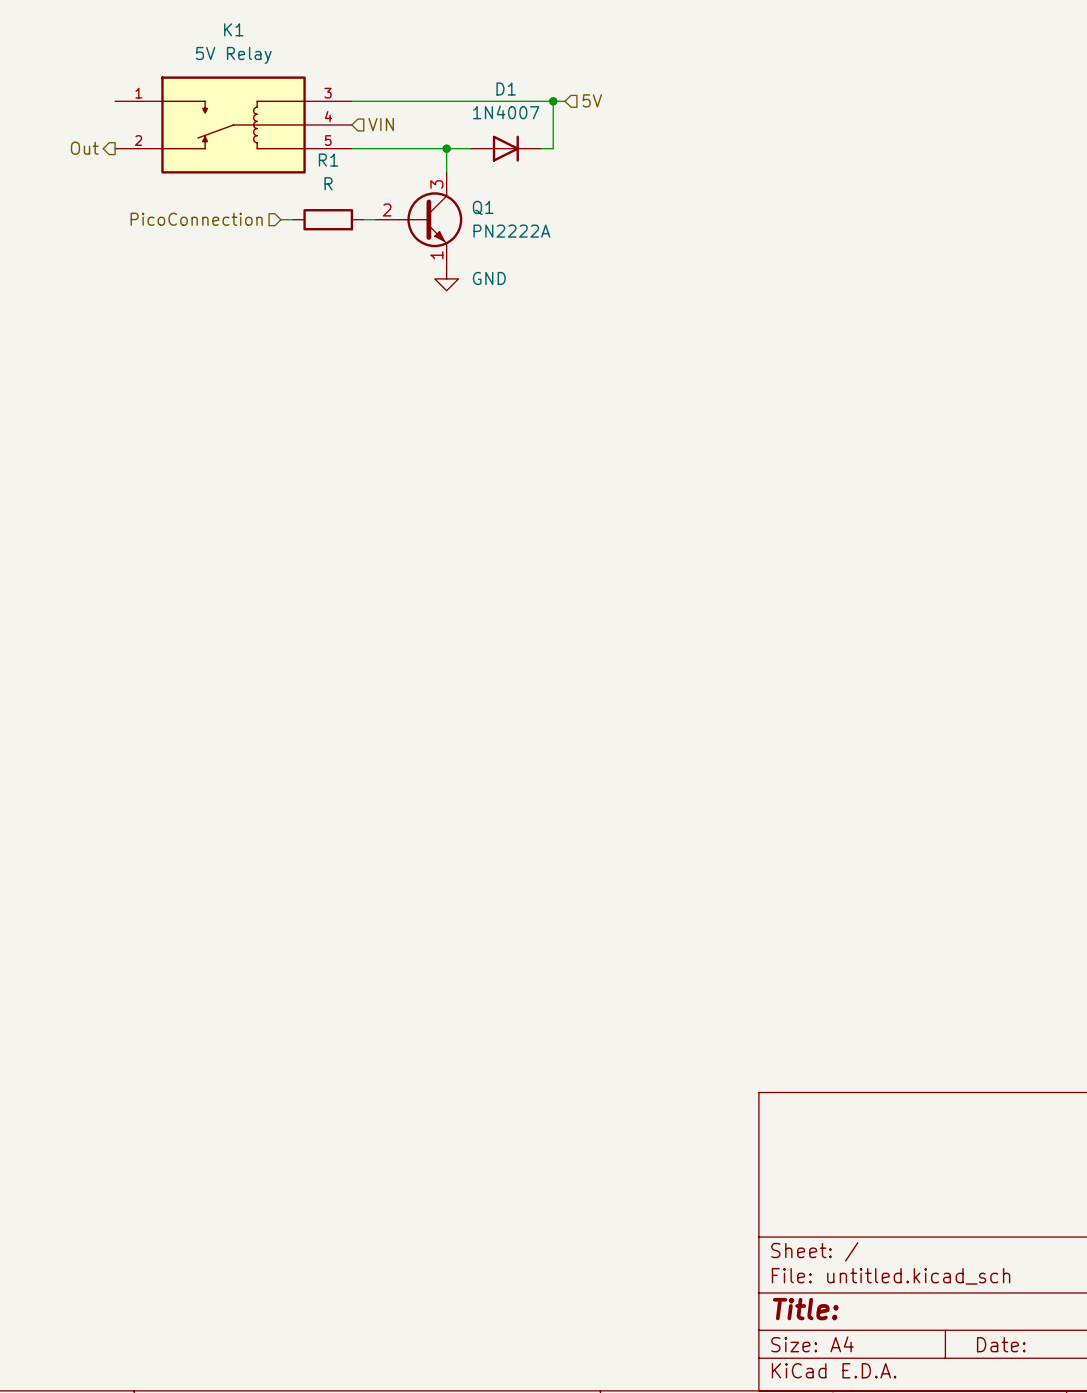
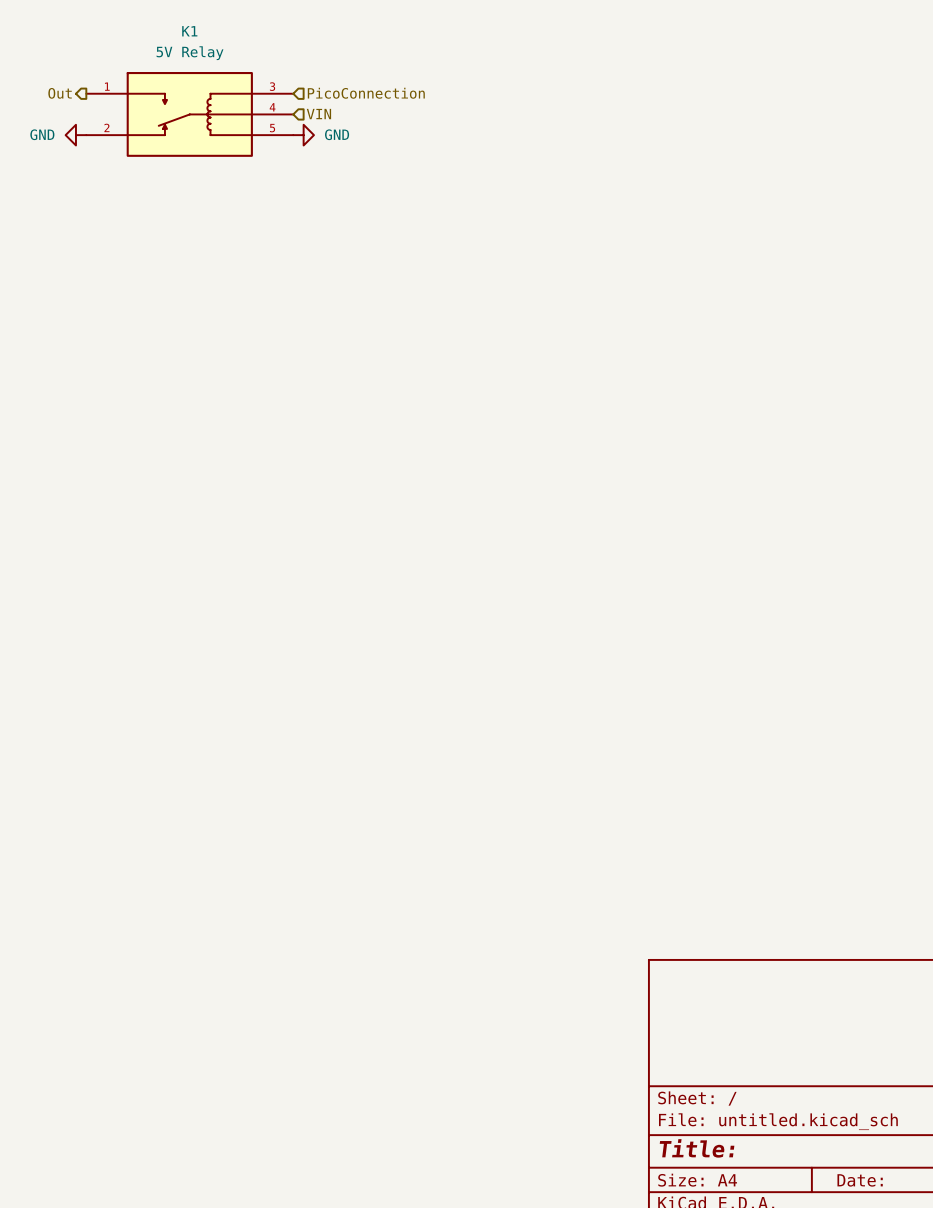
hierarchical label: 5V (592, 100) -> none
wire: (351, 101) (565, 101) -> none
wire: (553, 101) (553, 148) (541, 148) -> none
junction: (553, 101) -> none
hierarchical label position: Out (84, 148) -> Out (60, 93)
power symbol: none -> GND (75, 135)
wire: (351, 148) (470, 148) -> none
wire: (446, 148) (446, 172) -> none
junction: (446, 148) -> none
D1: 1N4007 (505, 148) -> none
hierarchical label rotation: 0° (196, 219) -> 180° (366, 93)
hierarchical label position: PicoConnection (196, 219) -> PicoConnection (366, 93)
wire: (280, 219) (292, 219) -> none
R1: R (328, 219) -> none
wire: (363, 219) (375, 219) -> none
Q1: PN2222A (418, 219) -> none
power symbol rotation: 0° (446, 278) -> 90° counterclockwise (303, 135)
power symbol position: GND (446, 278) -> GND (303, 135)

